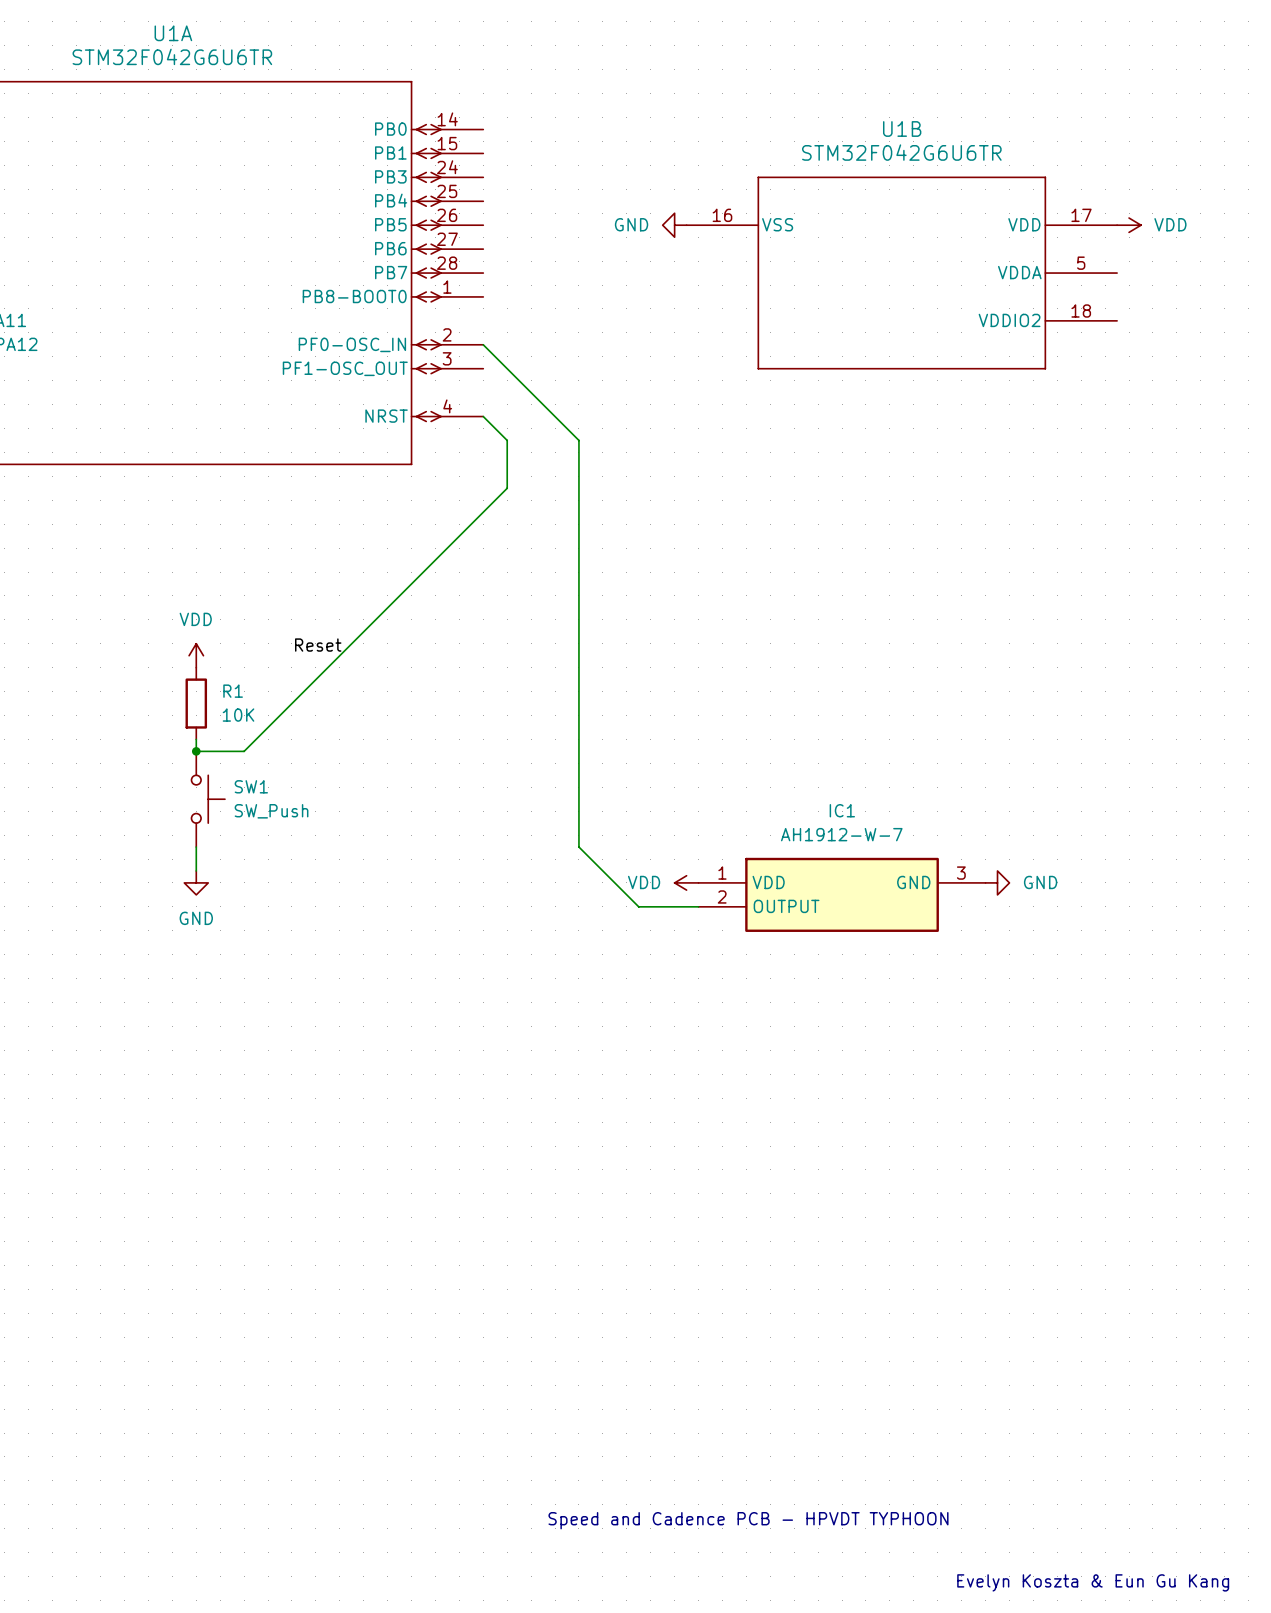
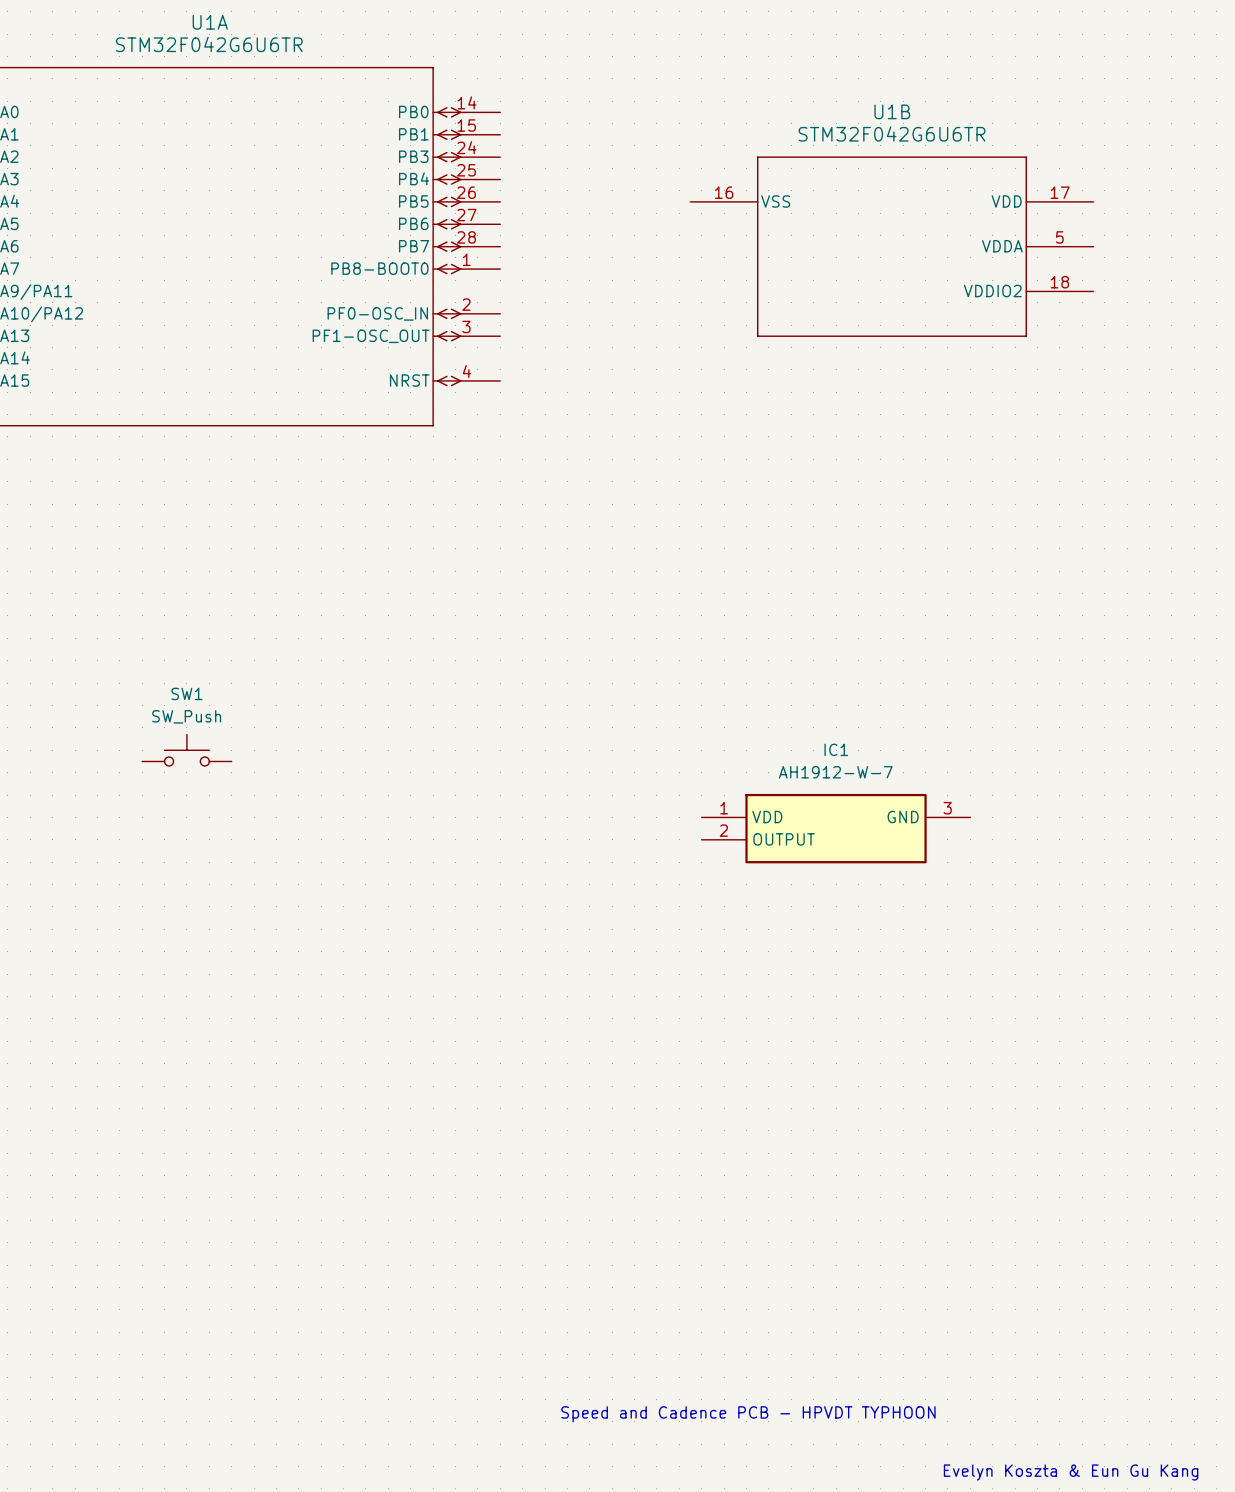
power symbol: GND (674, 225) -> none
power symbol: VDD (1129, 225) -> none
wire: (483, 344) (578, 440) (578, 847) (638, 906) (698, 906) -> none
wire: (483, 416) (507, 440) (507, 488) (244, 751) (196, 751) (196, 739) -> none
label: Reset (318, 645) -> none
power symbol: VDD (196, 655) -> none
R1: 10K (196, 703) -> none
junction: (196, 751) -> none
SW1 rotation: 0° (208, 799) -> 90° counterclockwise (186, 750)
SW1 position: (208, 799) -> (186, 750)
SW1 value position: SW_Push (271, 811) -> SW_Push (186, 716)
wire: (196, 847) (196, 870) -> none
power symbol: GND (196, 882) -> none
power symbol: VDD (686, 882) -> none
power symbol: GND (997, 882) -> none

